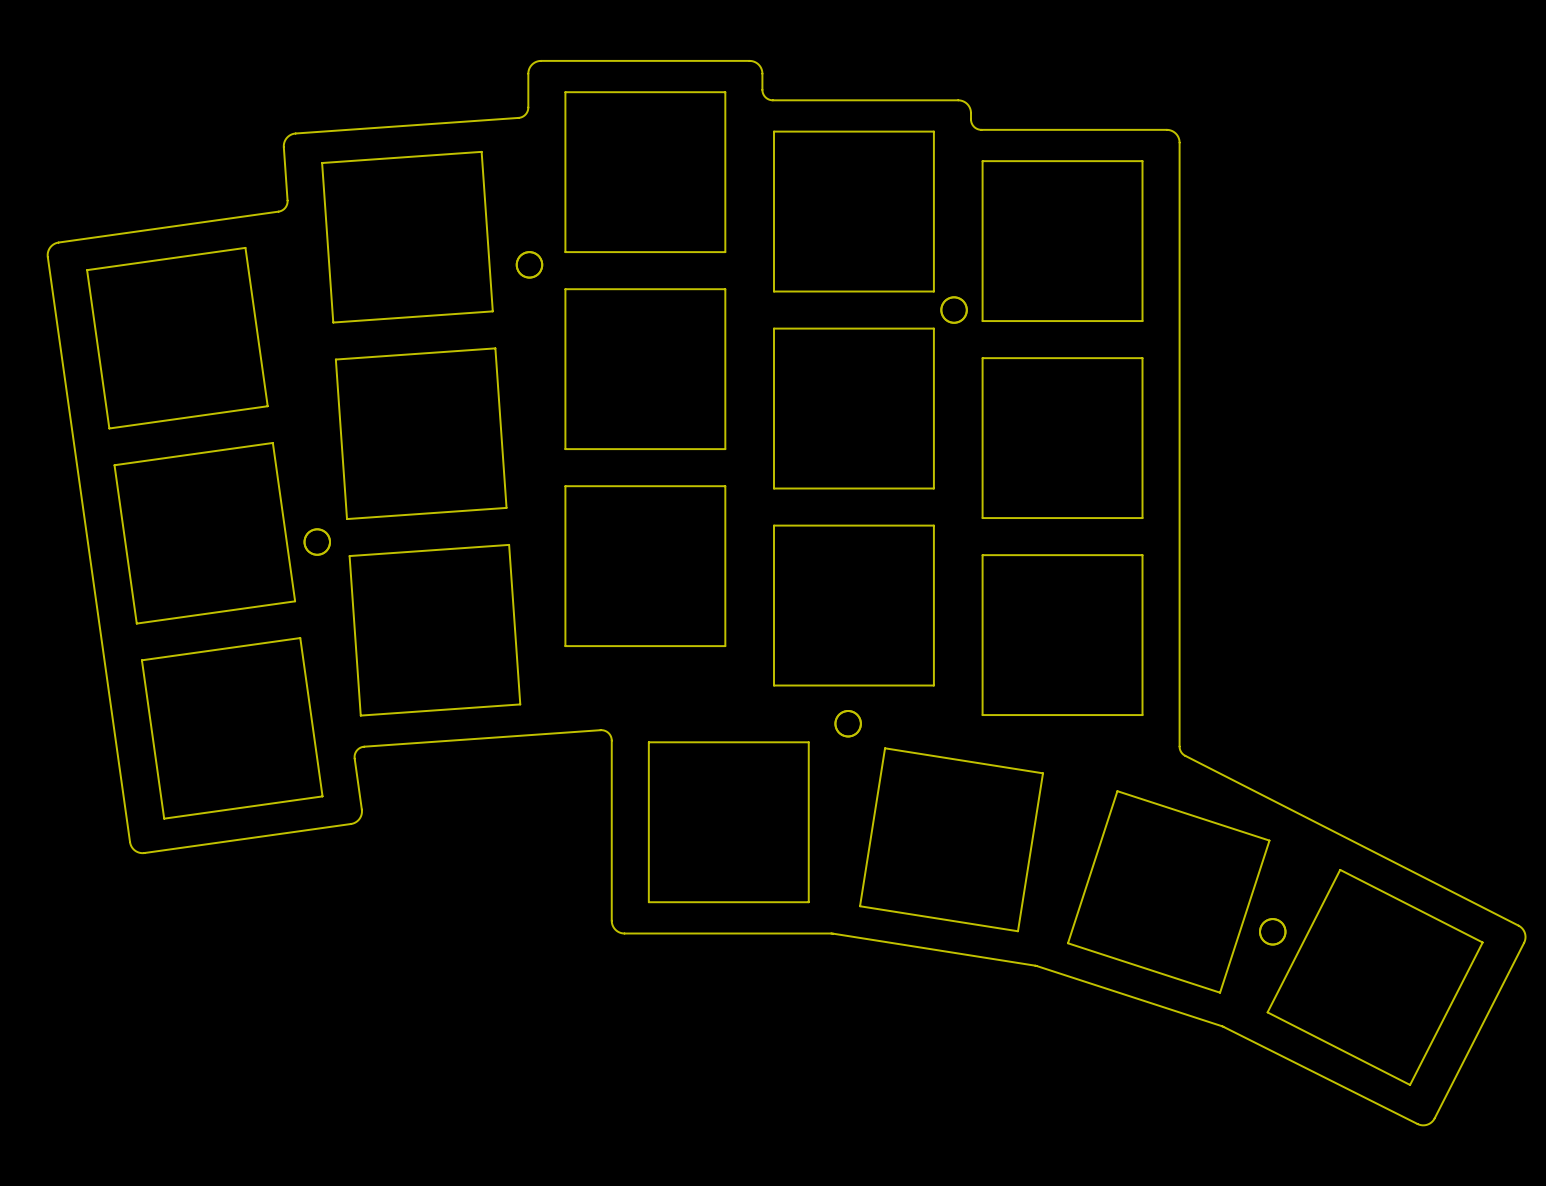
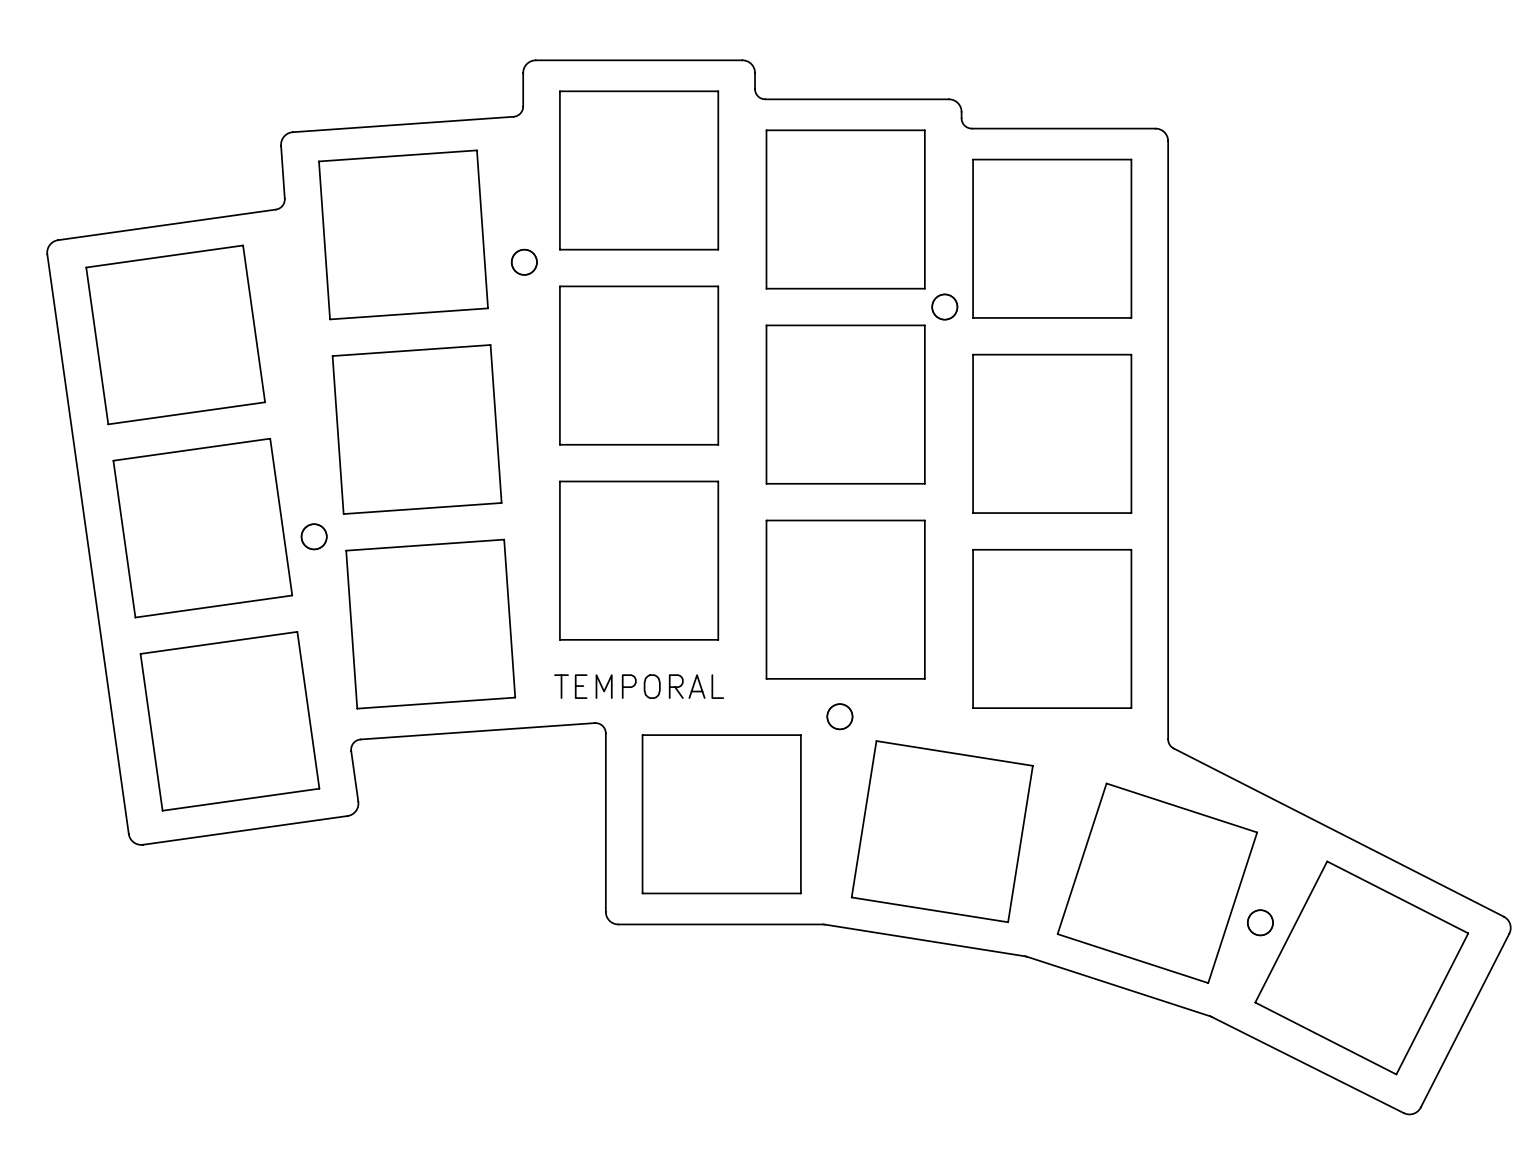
text: none -> TEMPORAL (639, 686)

